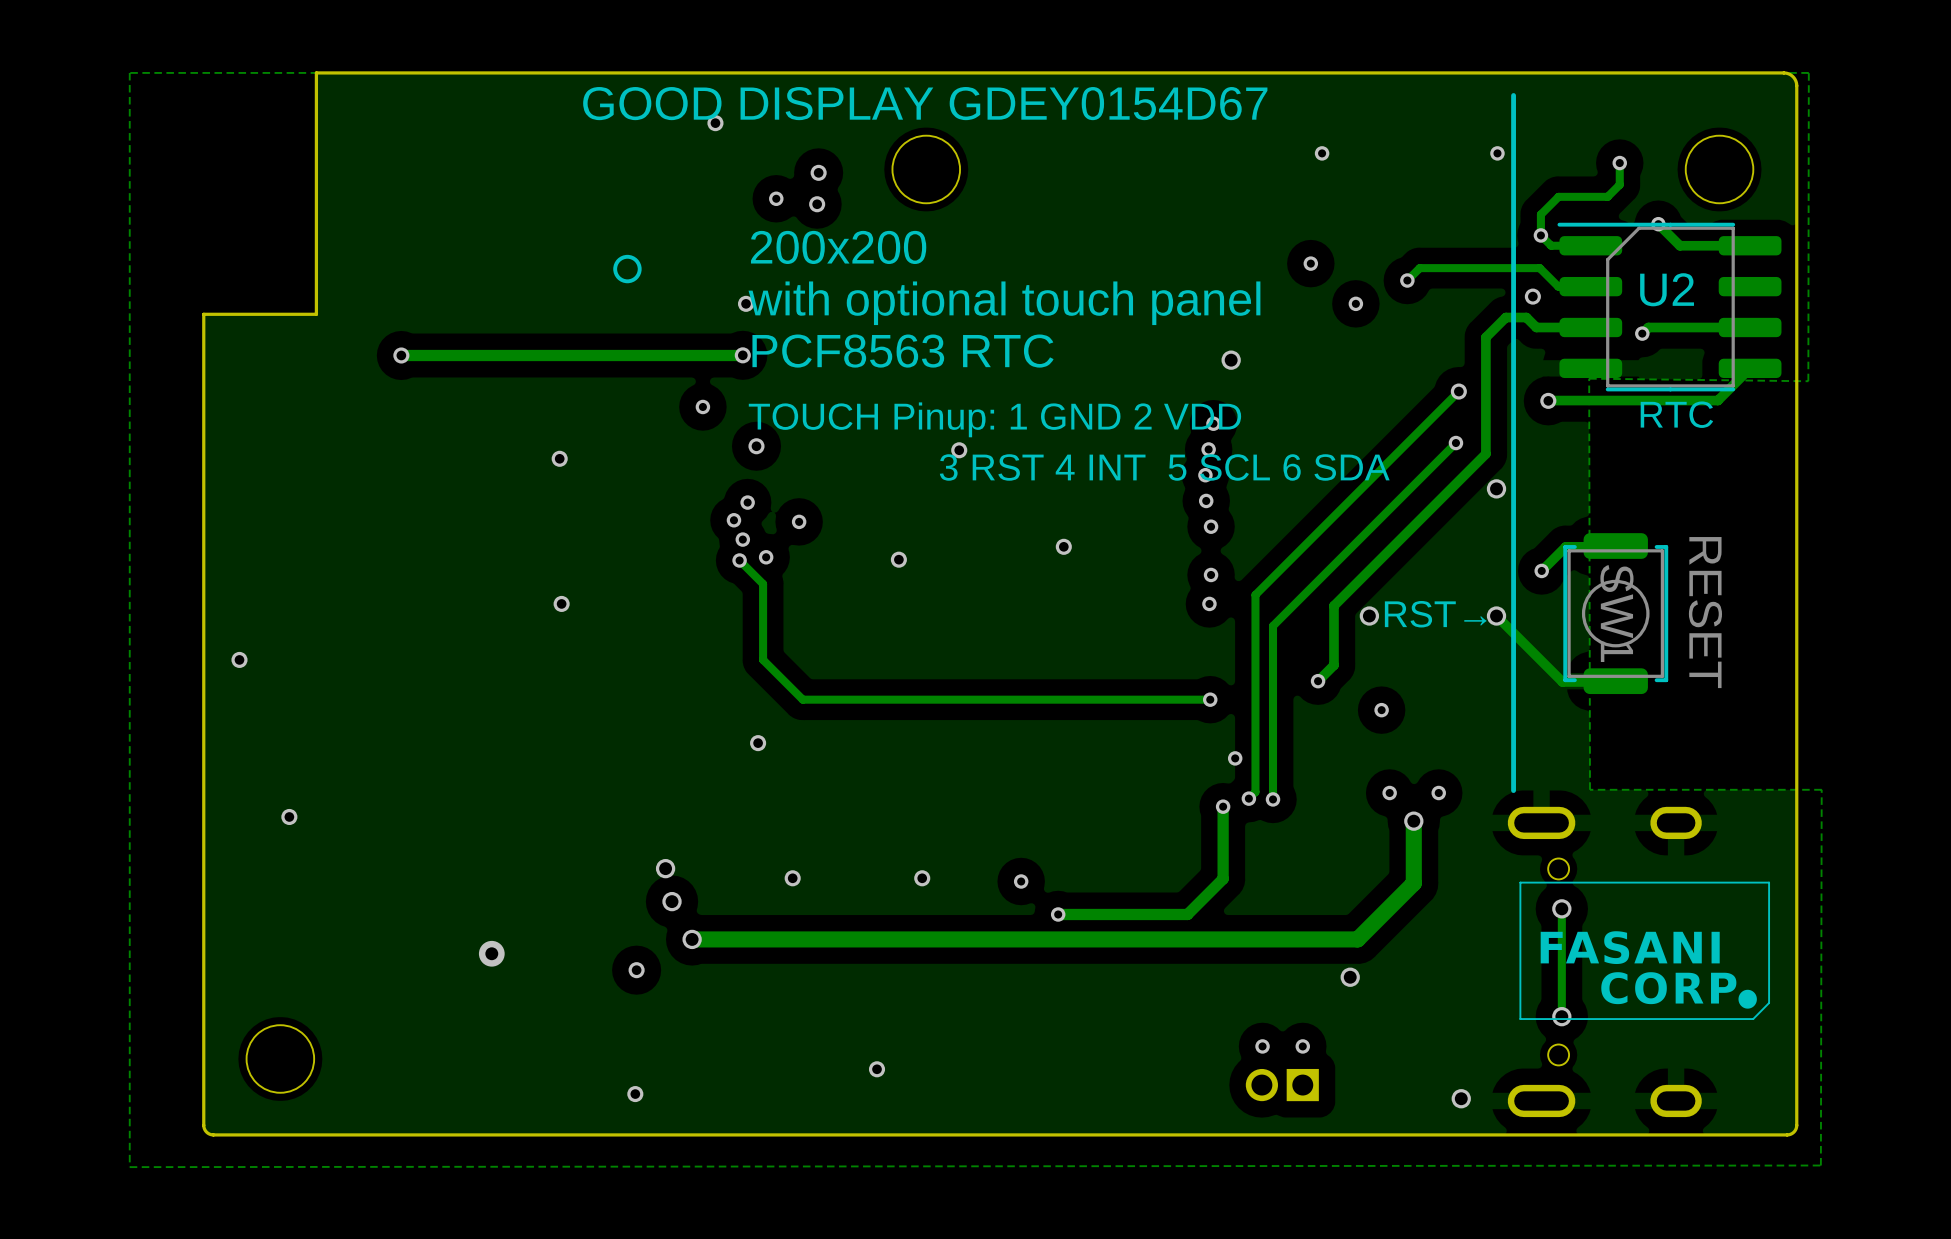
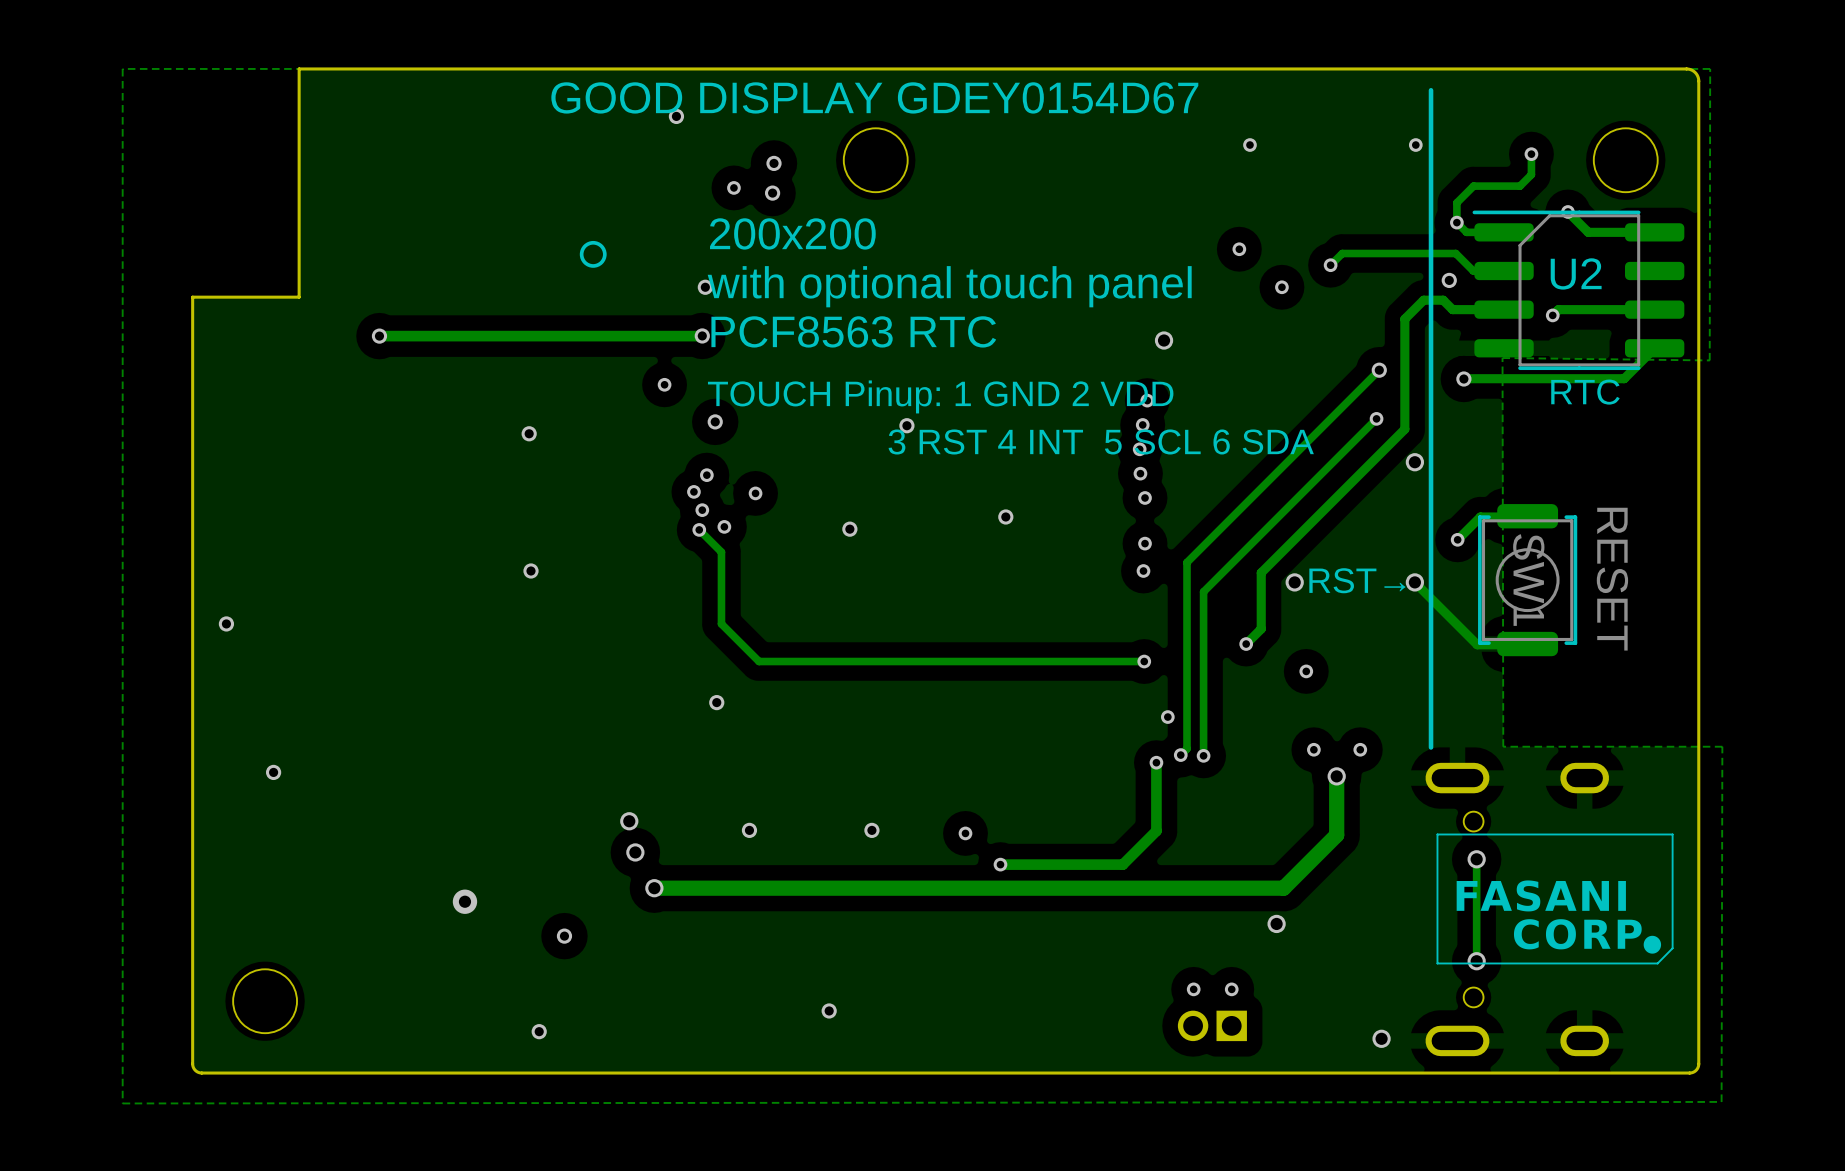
via position: (636, 970) -> (564, 936)
via: none -> (539, 1031)
via: (635, 1094) -> none

